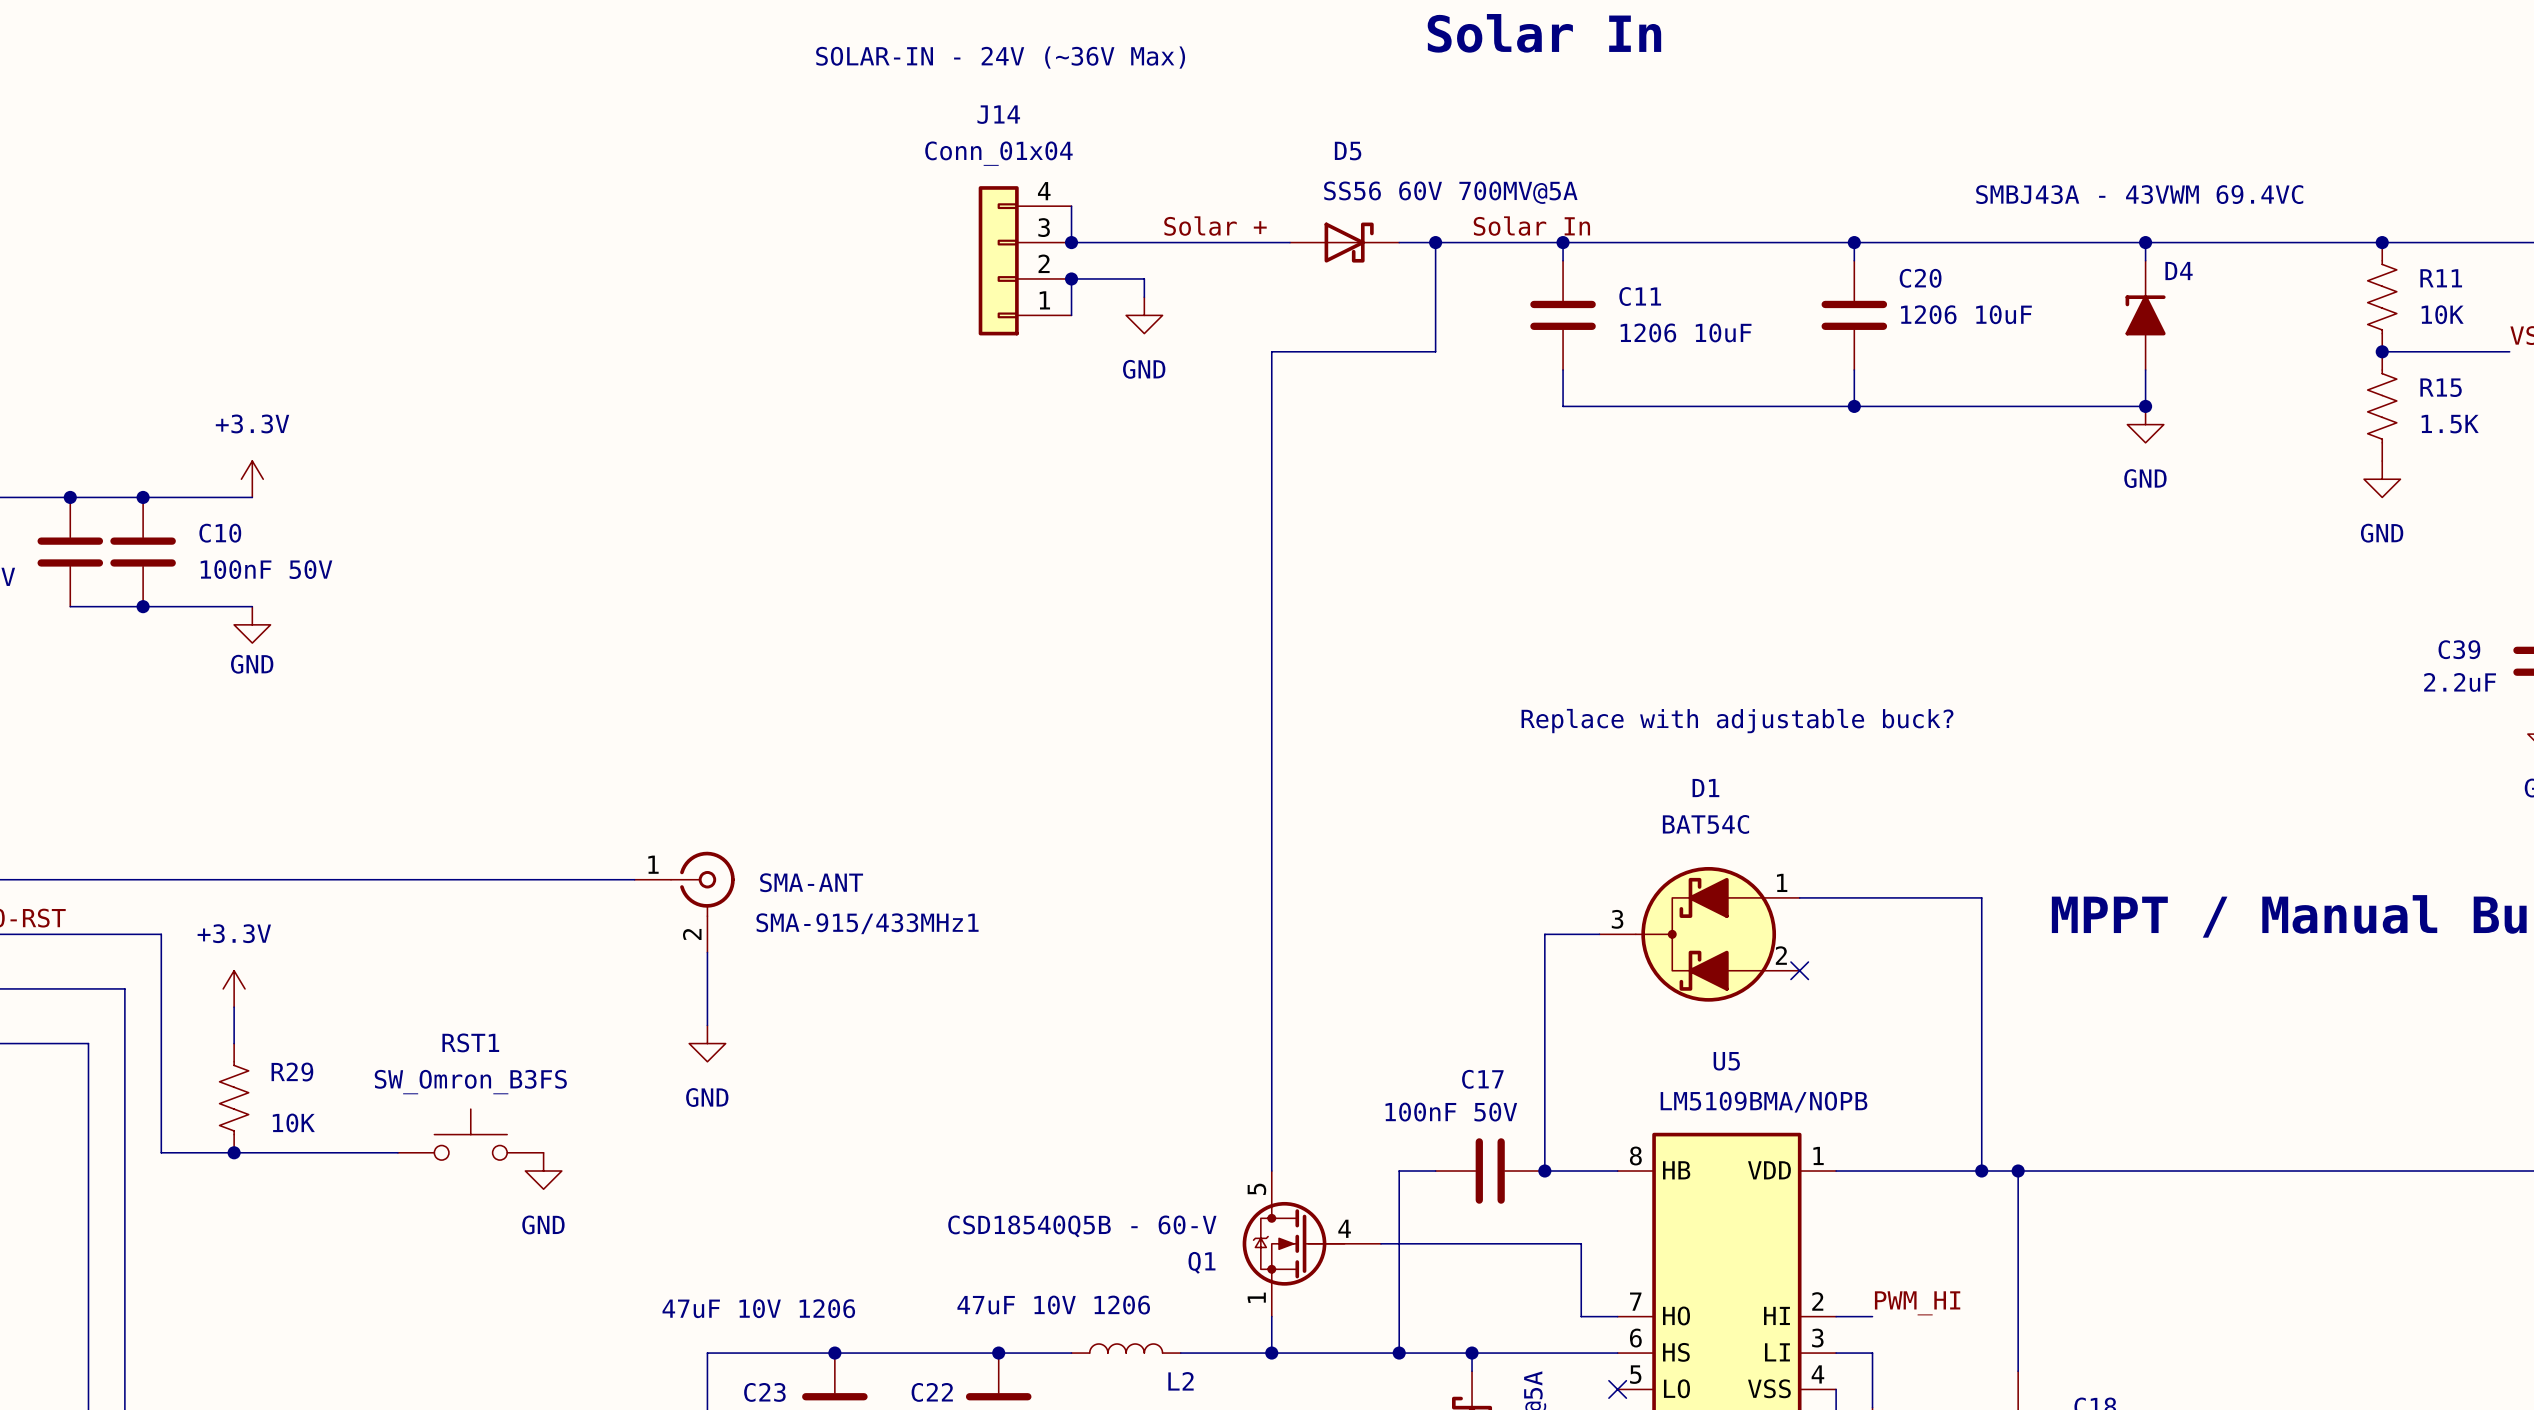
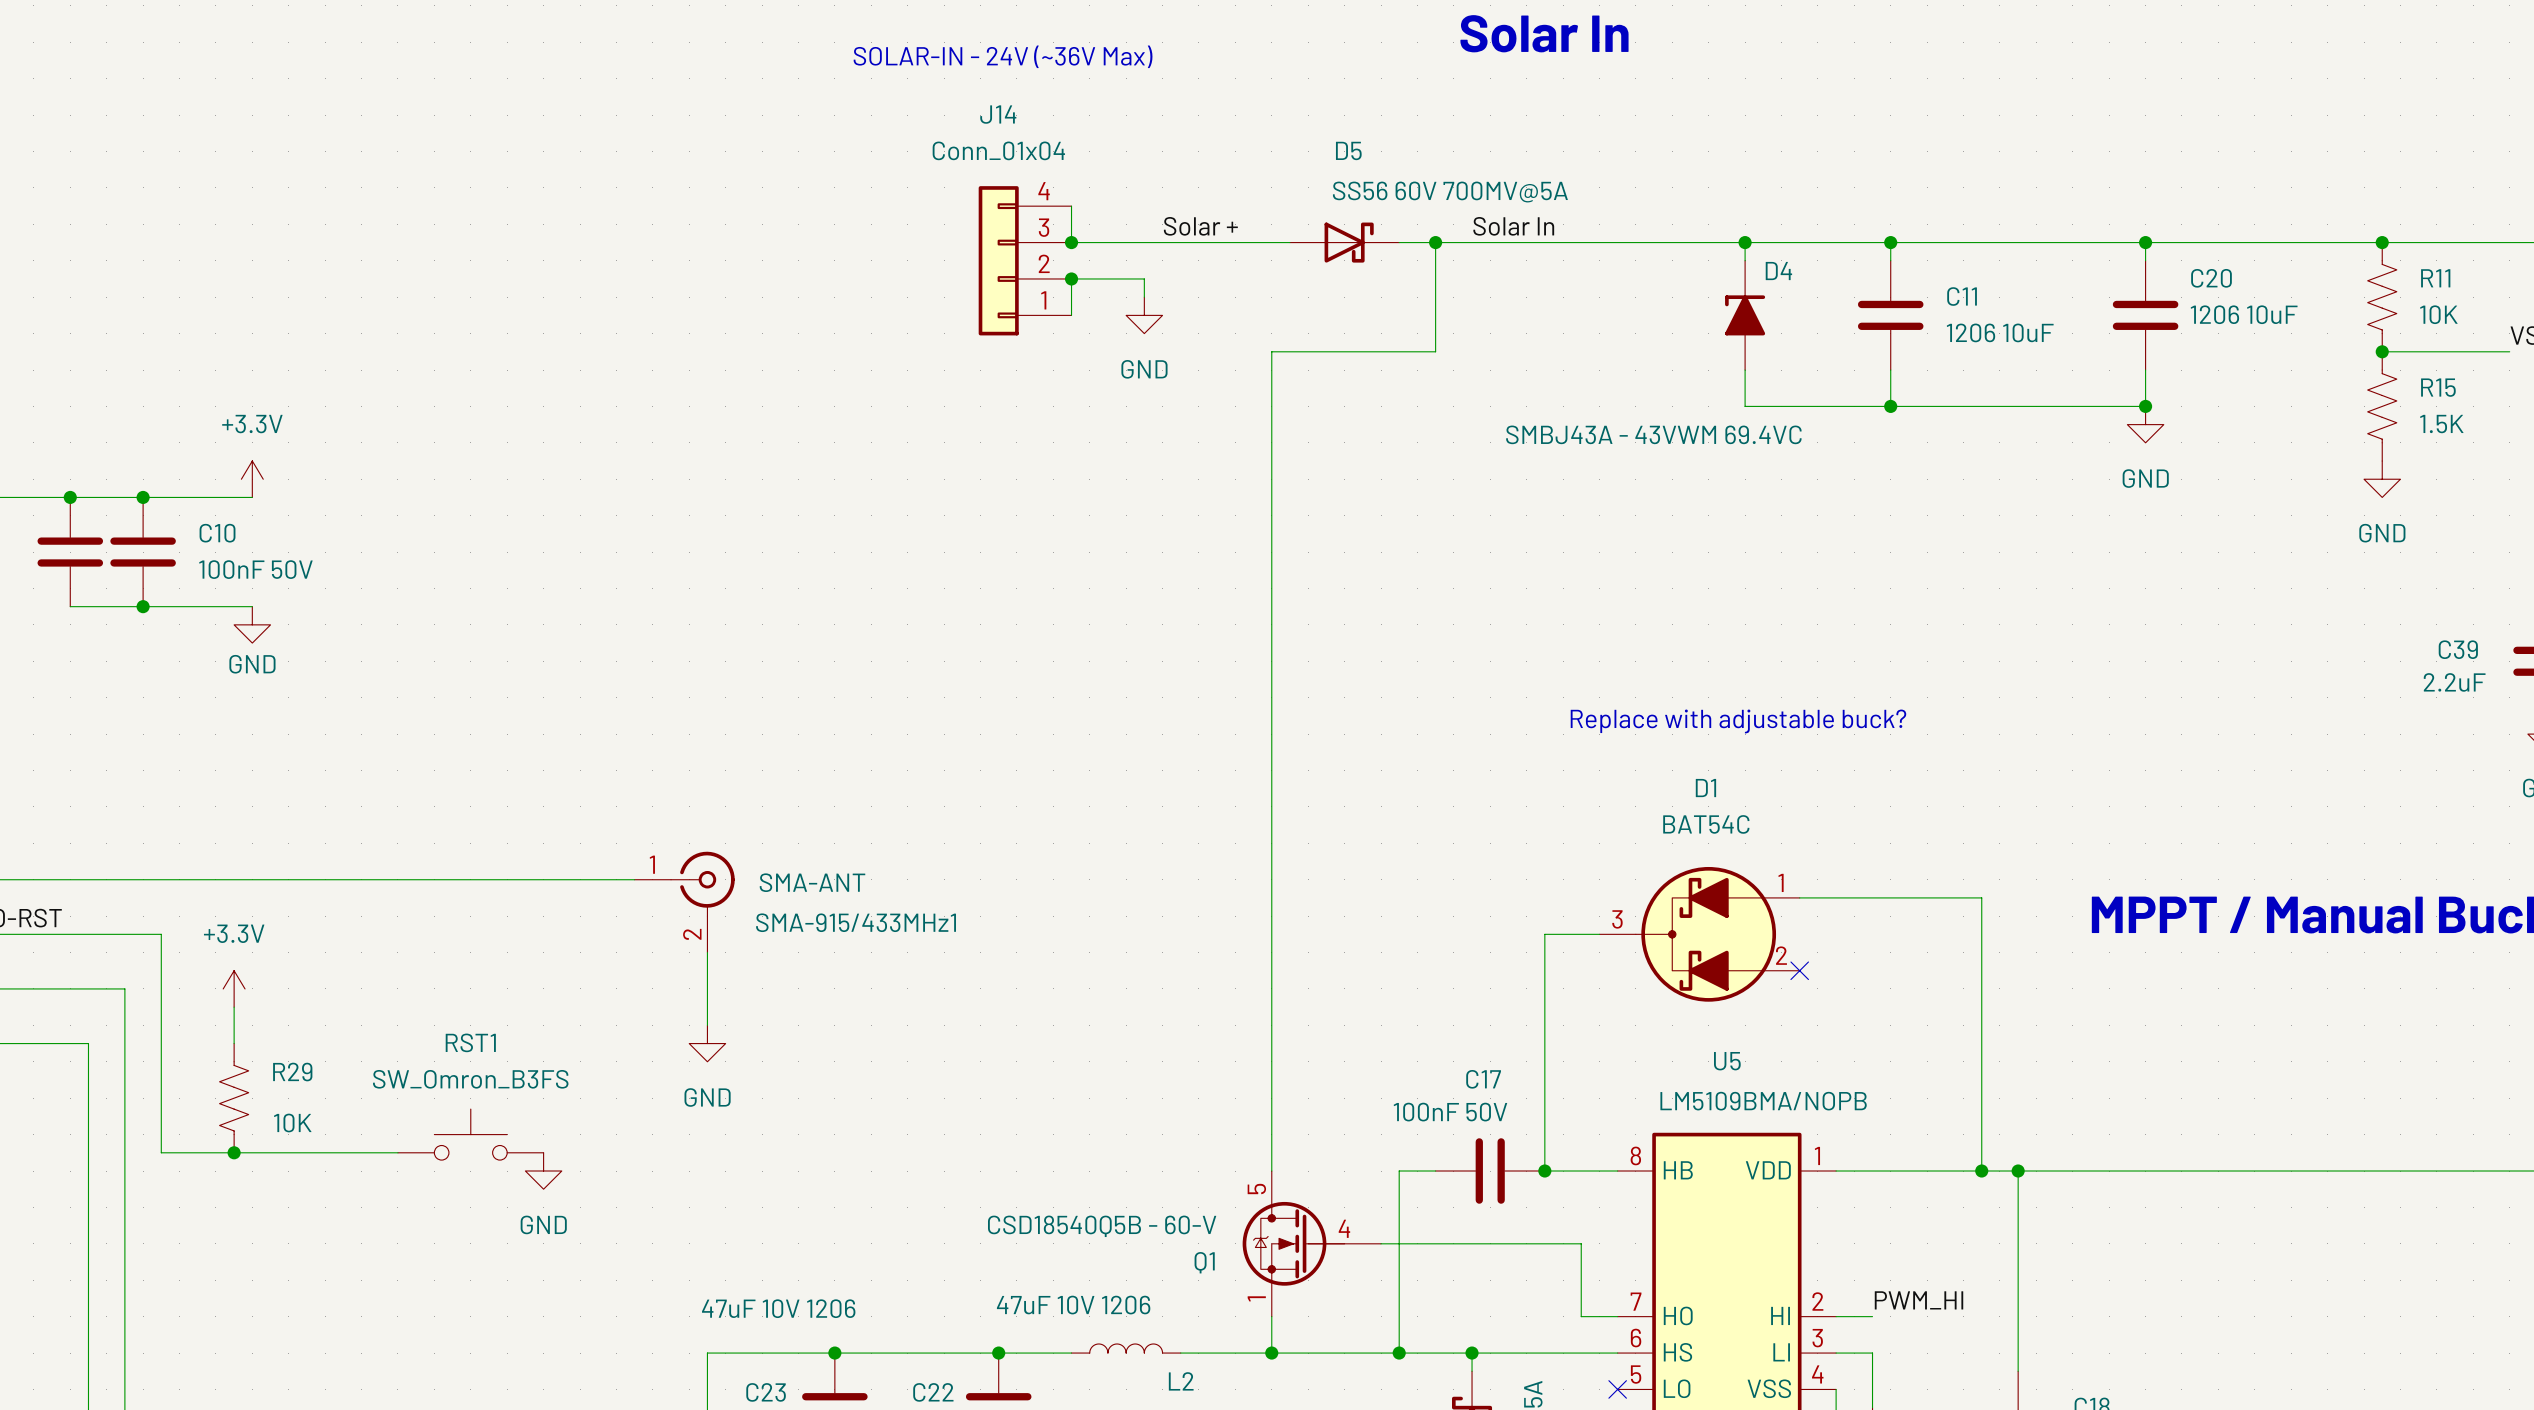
D4 value position: SMBJ43A - 43VWM 69.4VC (2139, 194) -> SMBJ43A - 43VWM 69.4VC (1653, 434)
wire: (1563, 242) (1563, 260) -> (1745, 242) (1745, 260)
junction: (1563, 242) -> none
junction: none -> (1745, 242)
wire: (1854, 242) (1854, 260) -> (1890, 242) (1890, 260)
junction position: (1854, 242) -> (1890, 242)
C11 position: (1563, 315) -> (1890, 315)
C20 position: (1854, 315) -> (2145, 315)
D4 position: (2145, 315) -> (1745, 315)
wire: (1563, 370) (1563, 406) (1745, 406) -> (1745, 370) (1745, 406)
wire: (1854, 370) (1854, 406) -> (1890, 370) (1890, 406)
junction position: (1854, 406) -> (1890, 406)

